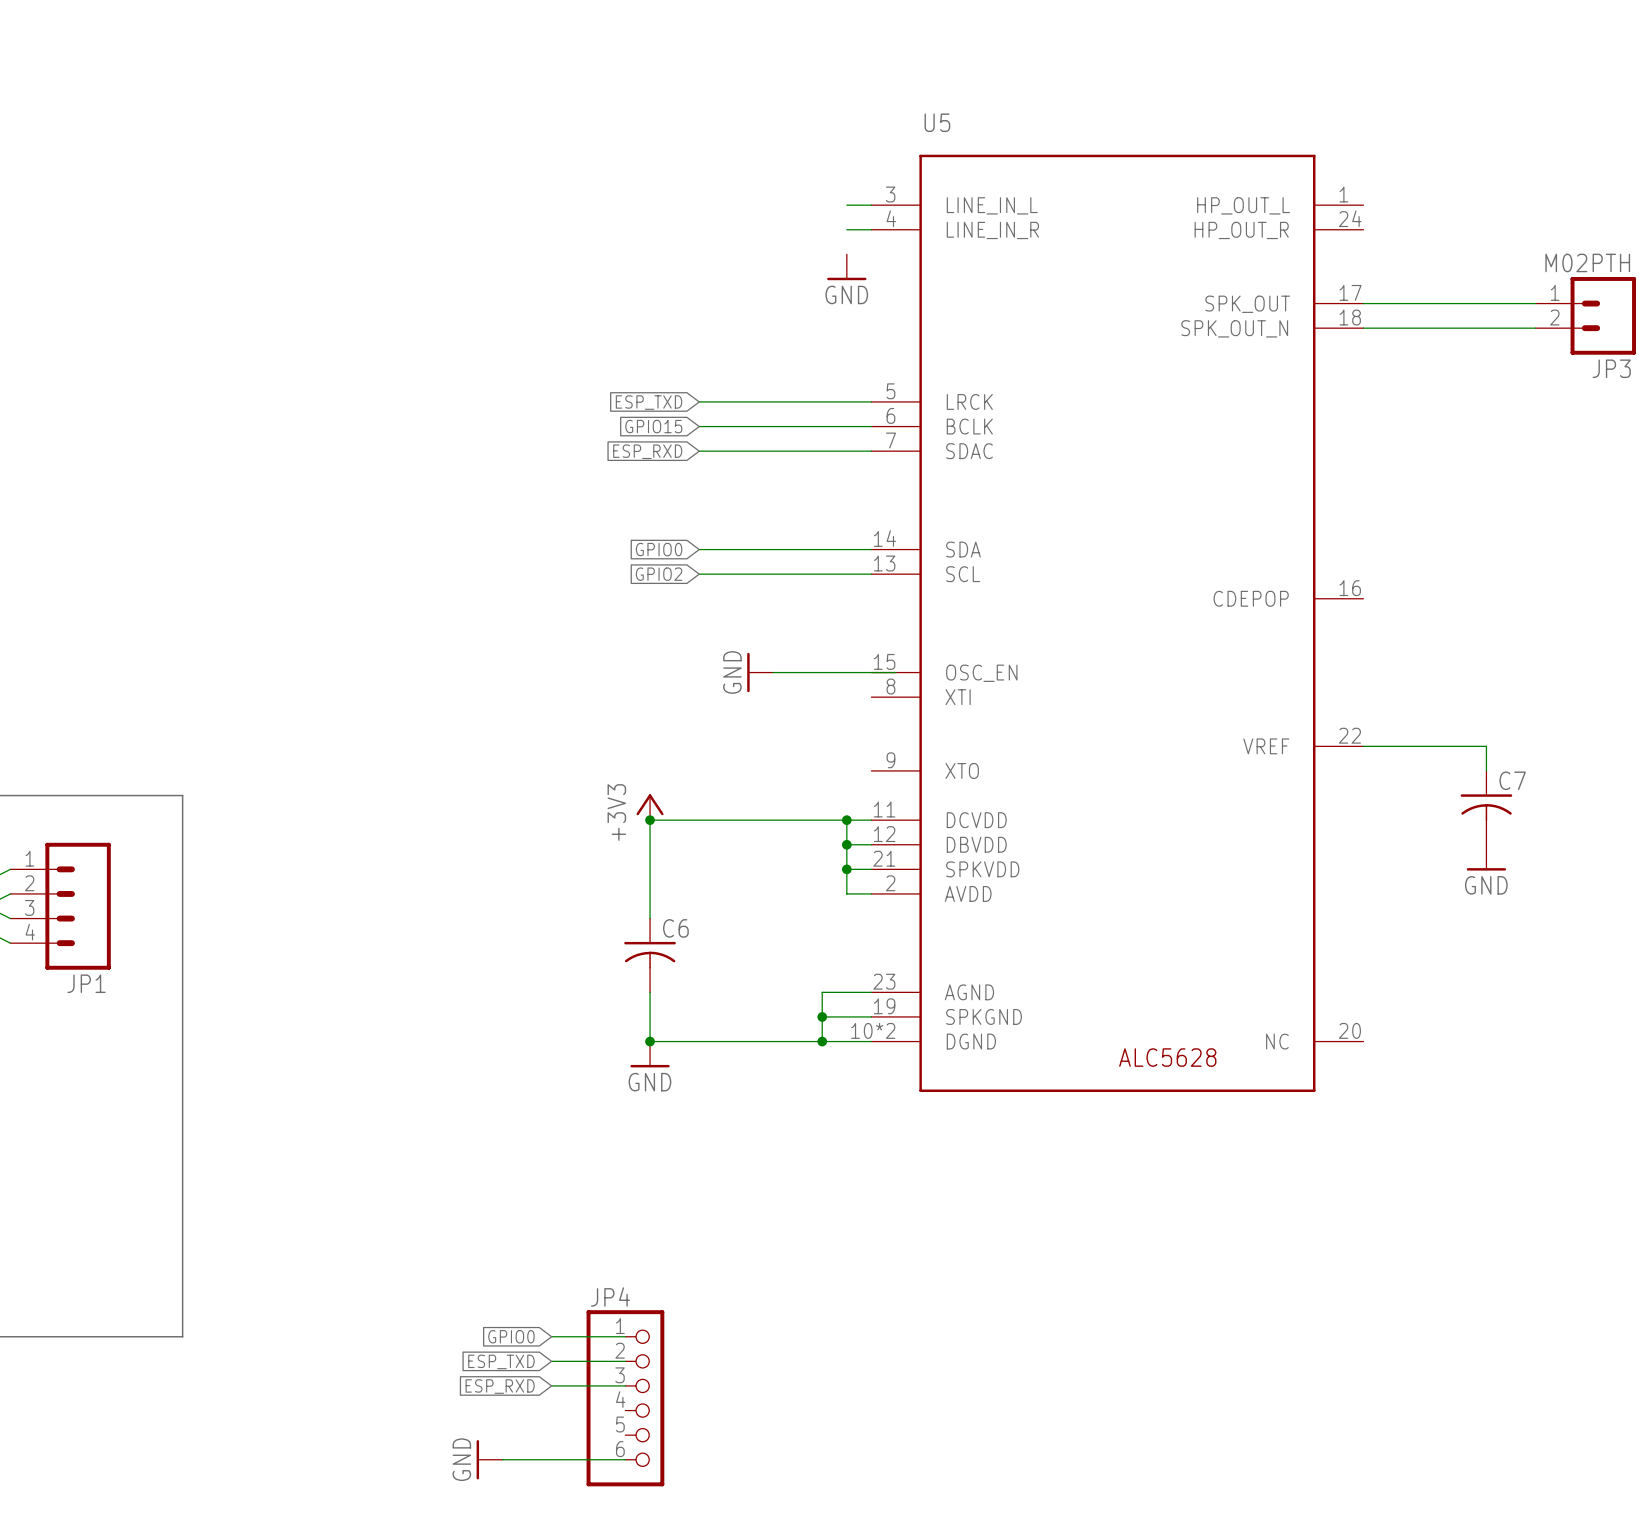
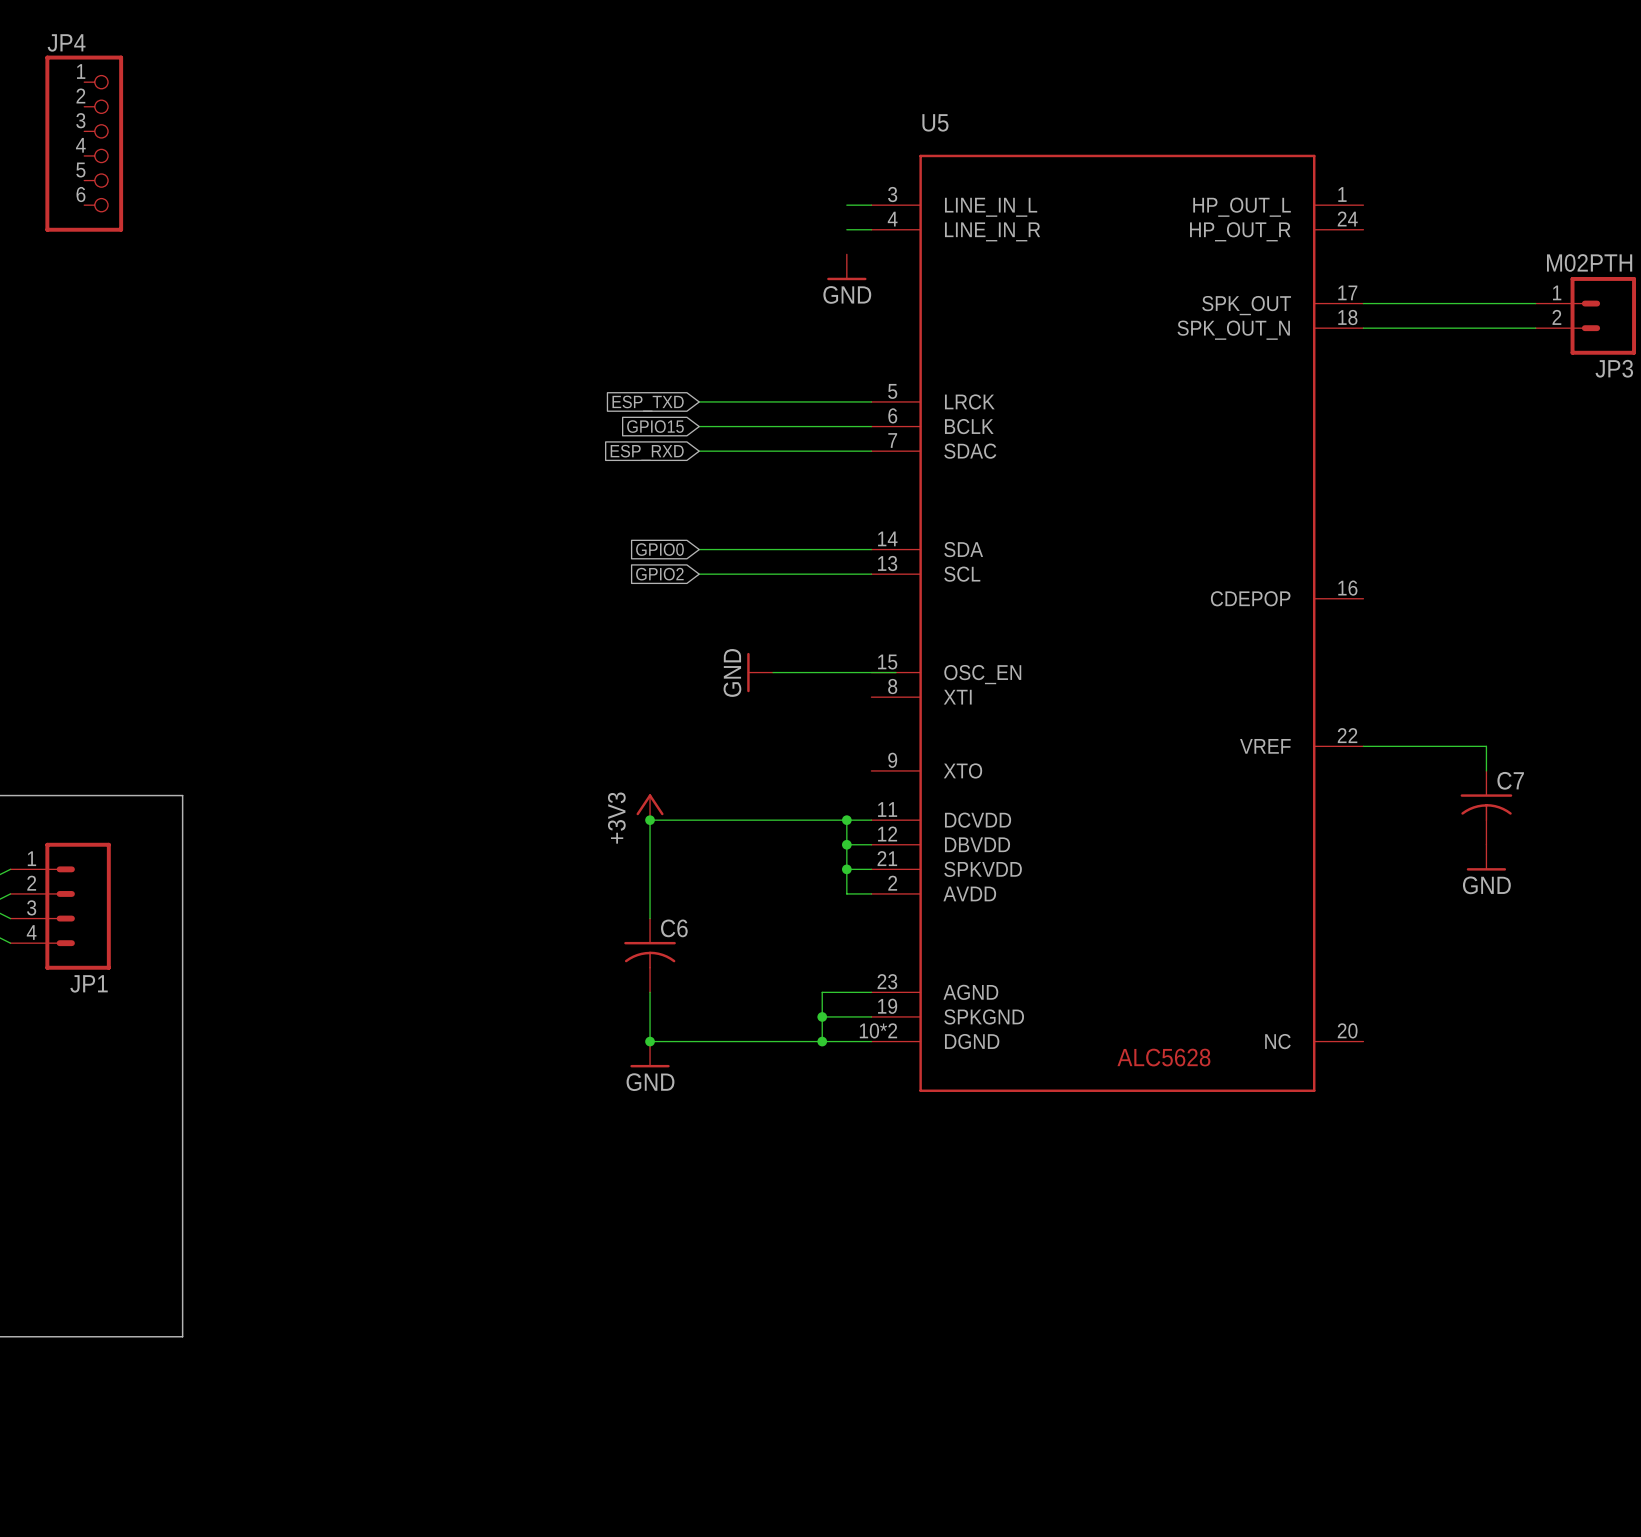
global label: GPIO0 (511, 1336) -> none
wire: (551, 1336) (625, 1336) -> none
global label: ESP_TXD (501, 1361) -> none
wire: (551, 1361) (625, 1361) -> none
wire: (551, 1385) (625, 1385) -> none
global label: ESP_RXD (500, 1386) -> none
JP4 position: (625, 1398) -> (84, 143)
power symbol: GND (489, 1459) -> none
wire: (502, 1459) (625, 1459) -> none

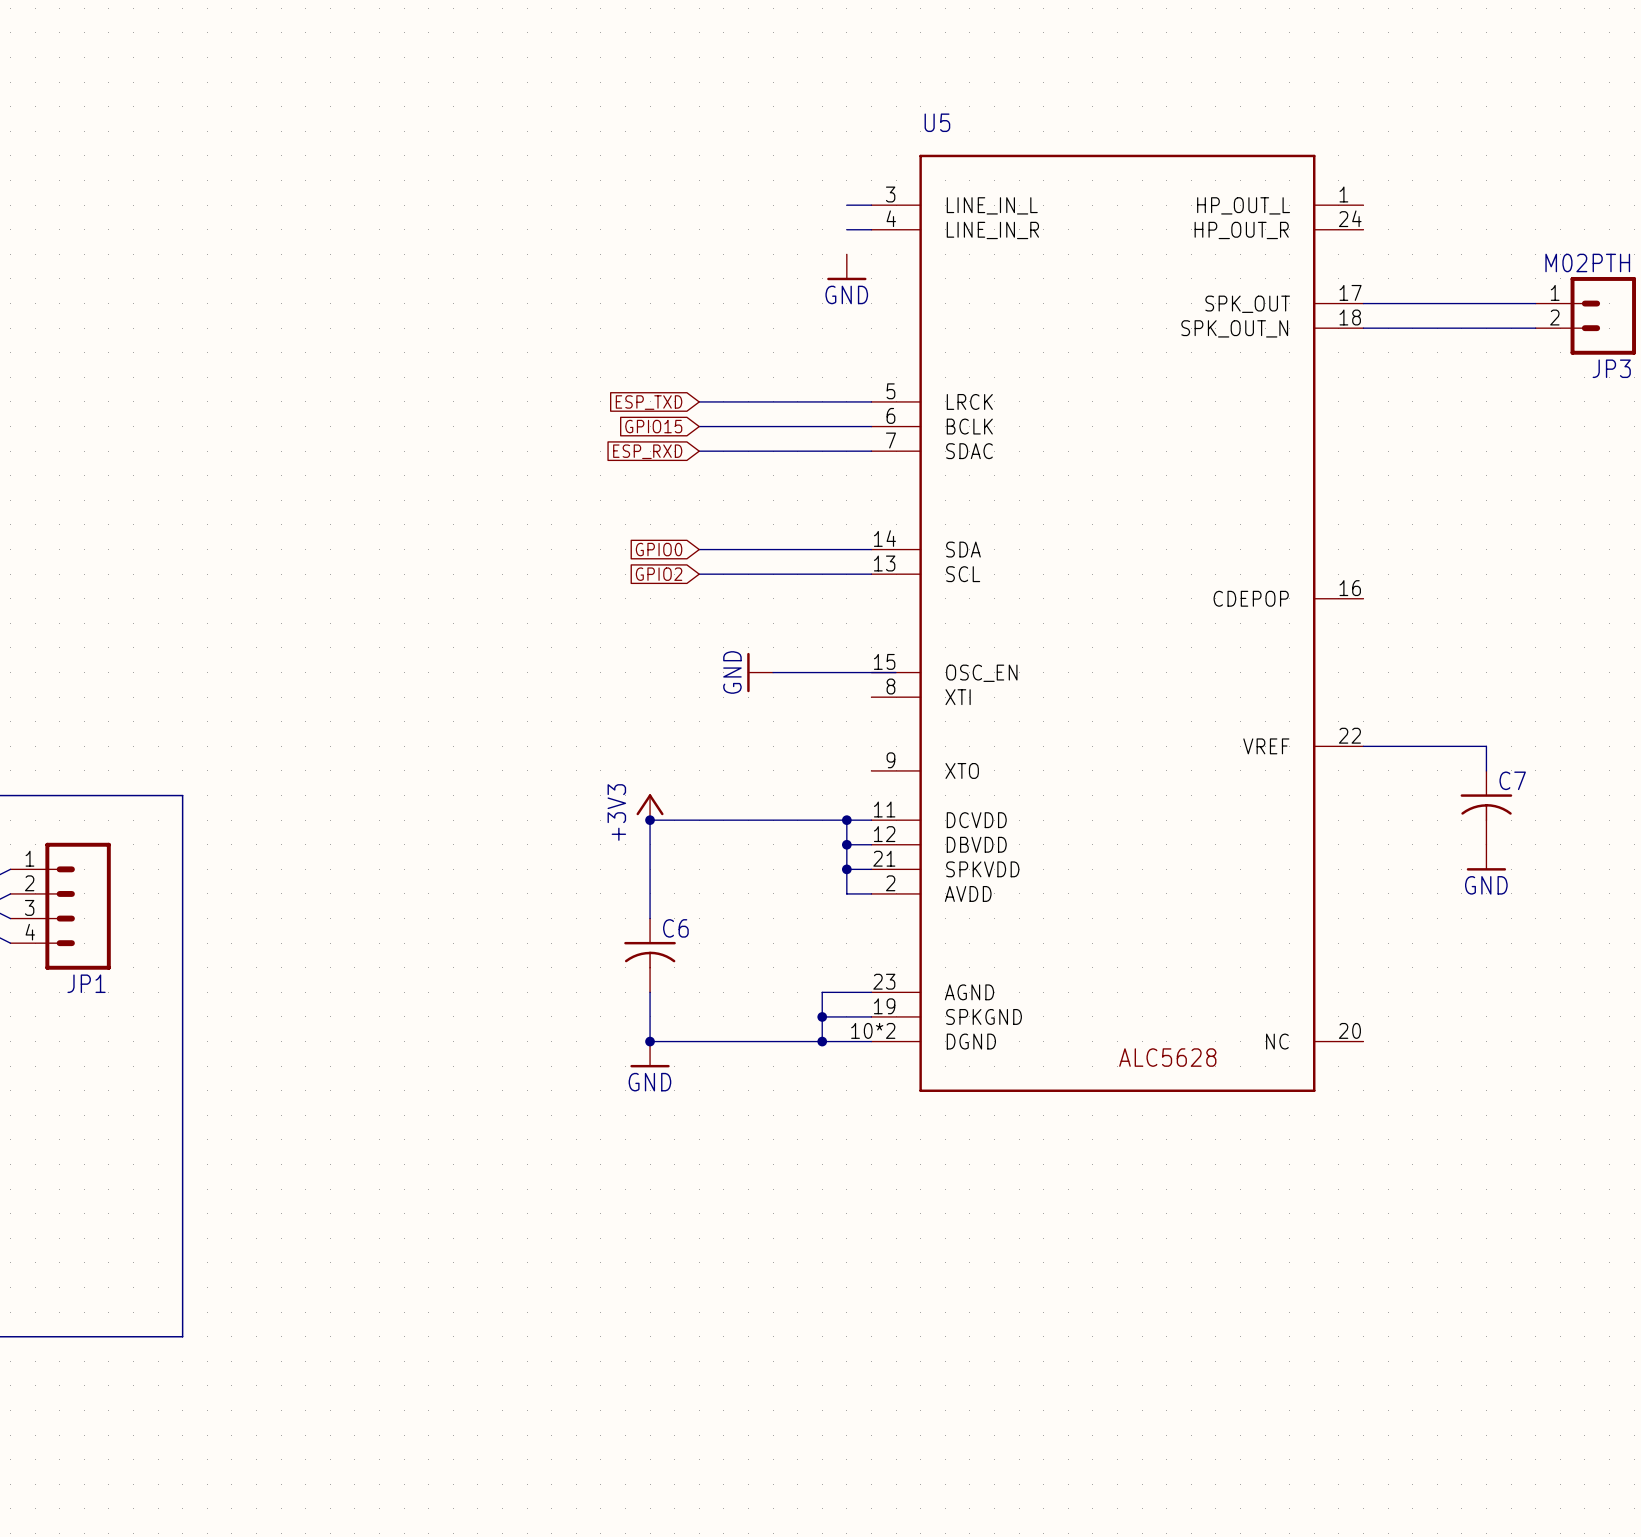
JP4: (84, 143) -> none

